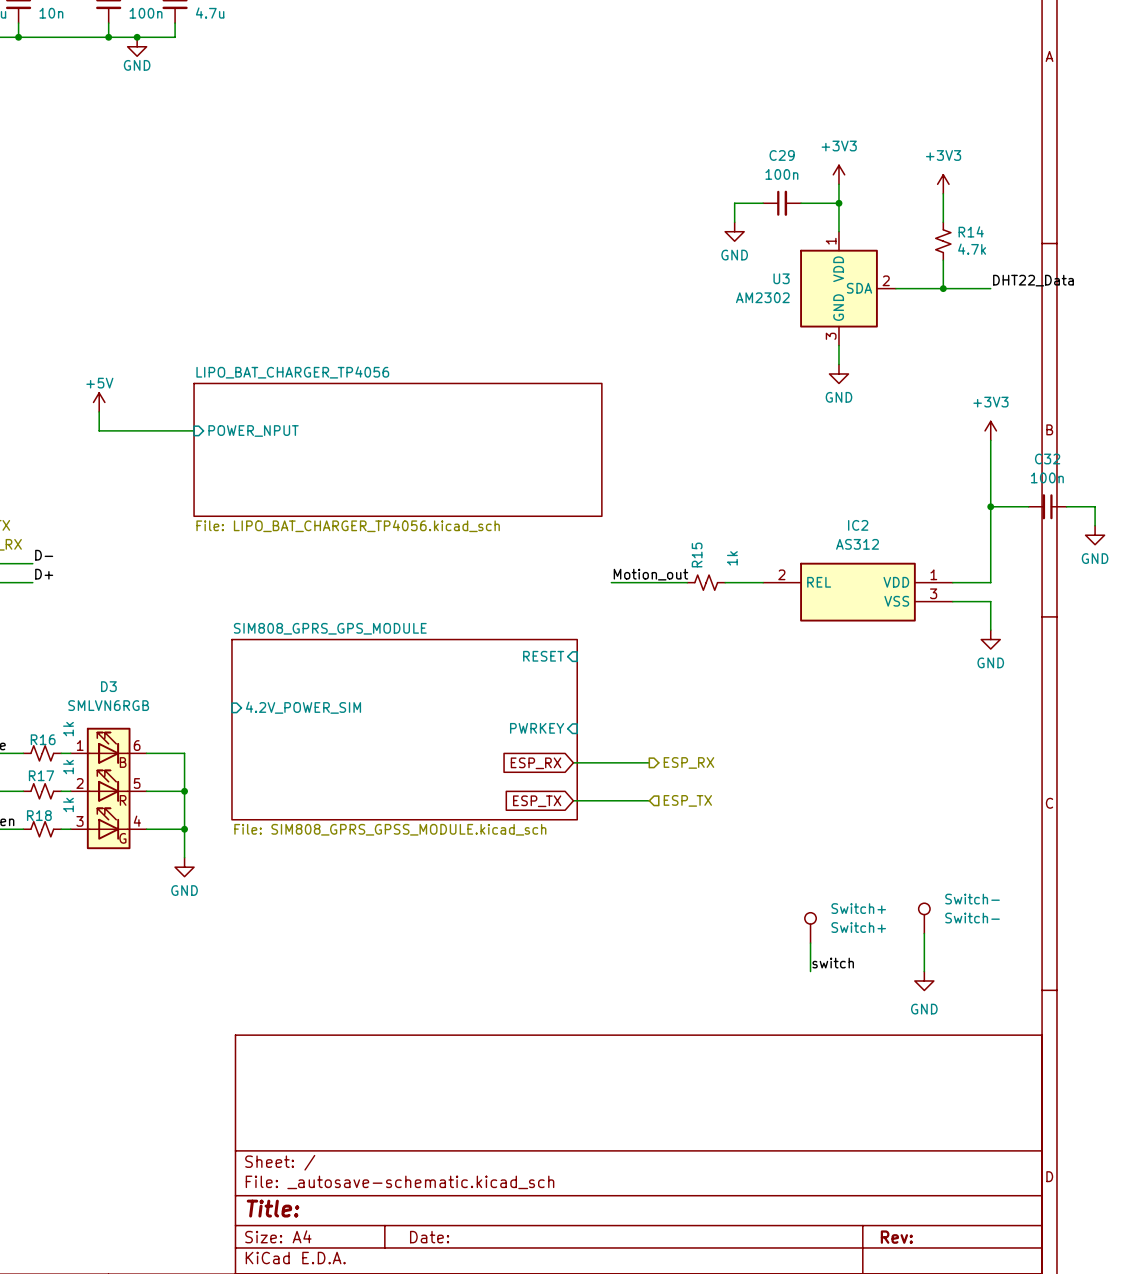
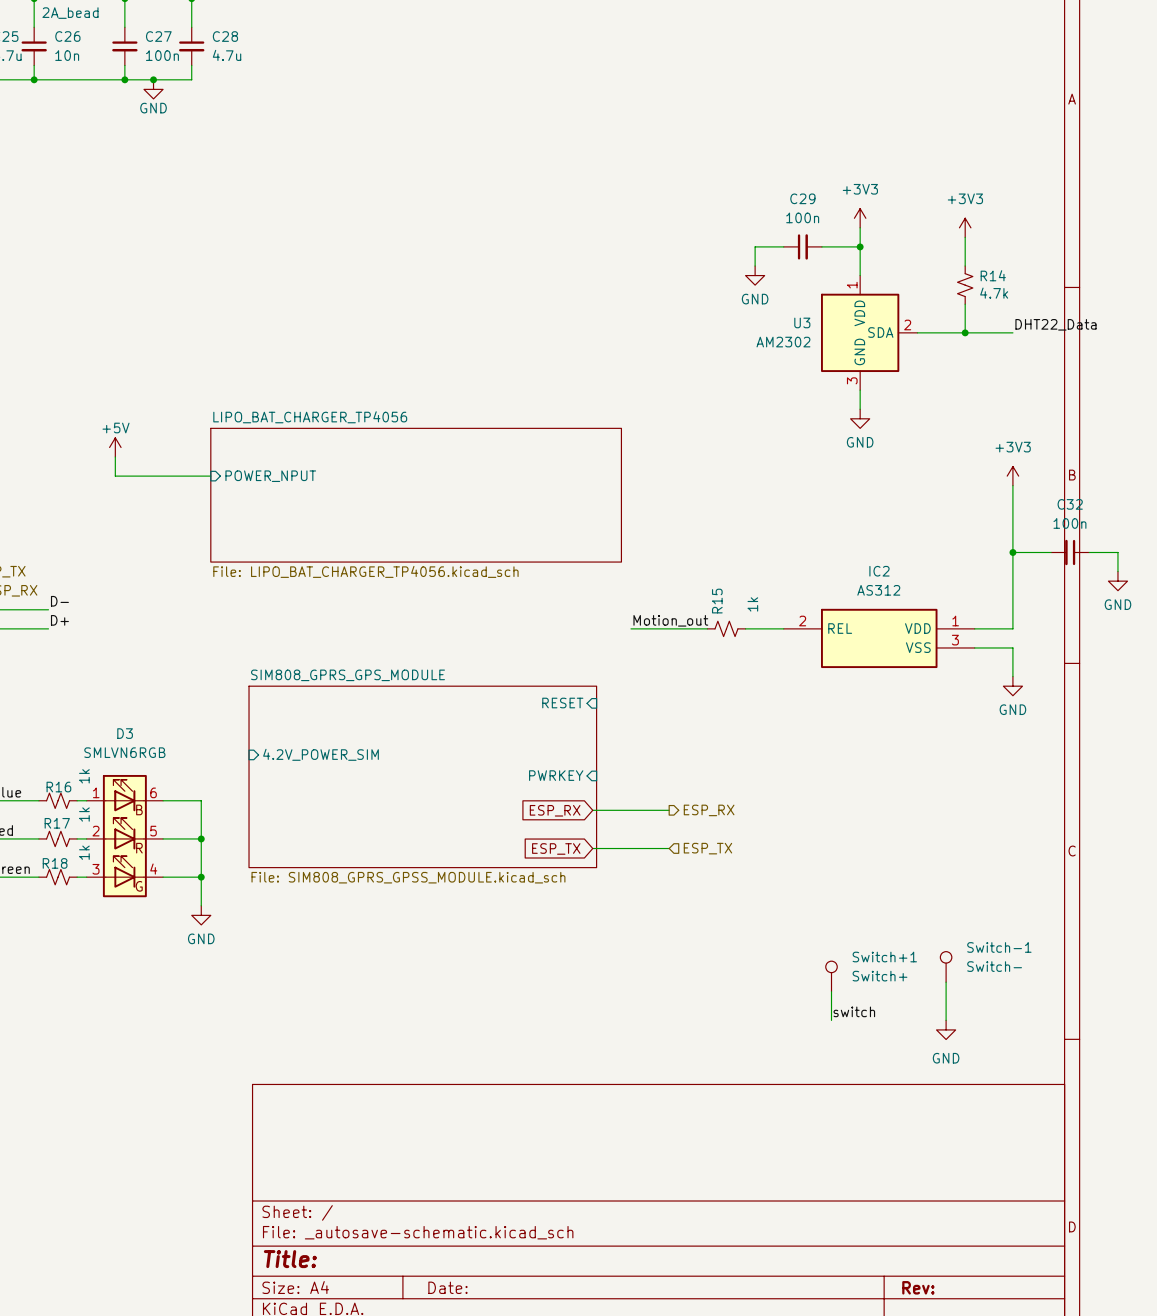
Switch- name: Switch- (972, 899) -> Switch-1 (999, 947)
Switch+ name: Switch+ (858, 908) -> Switch+1 (884, 957)

